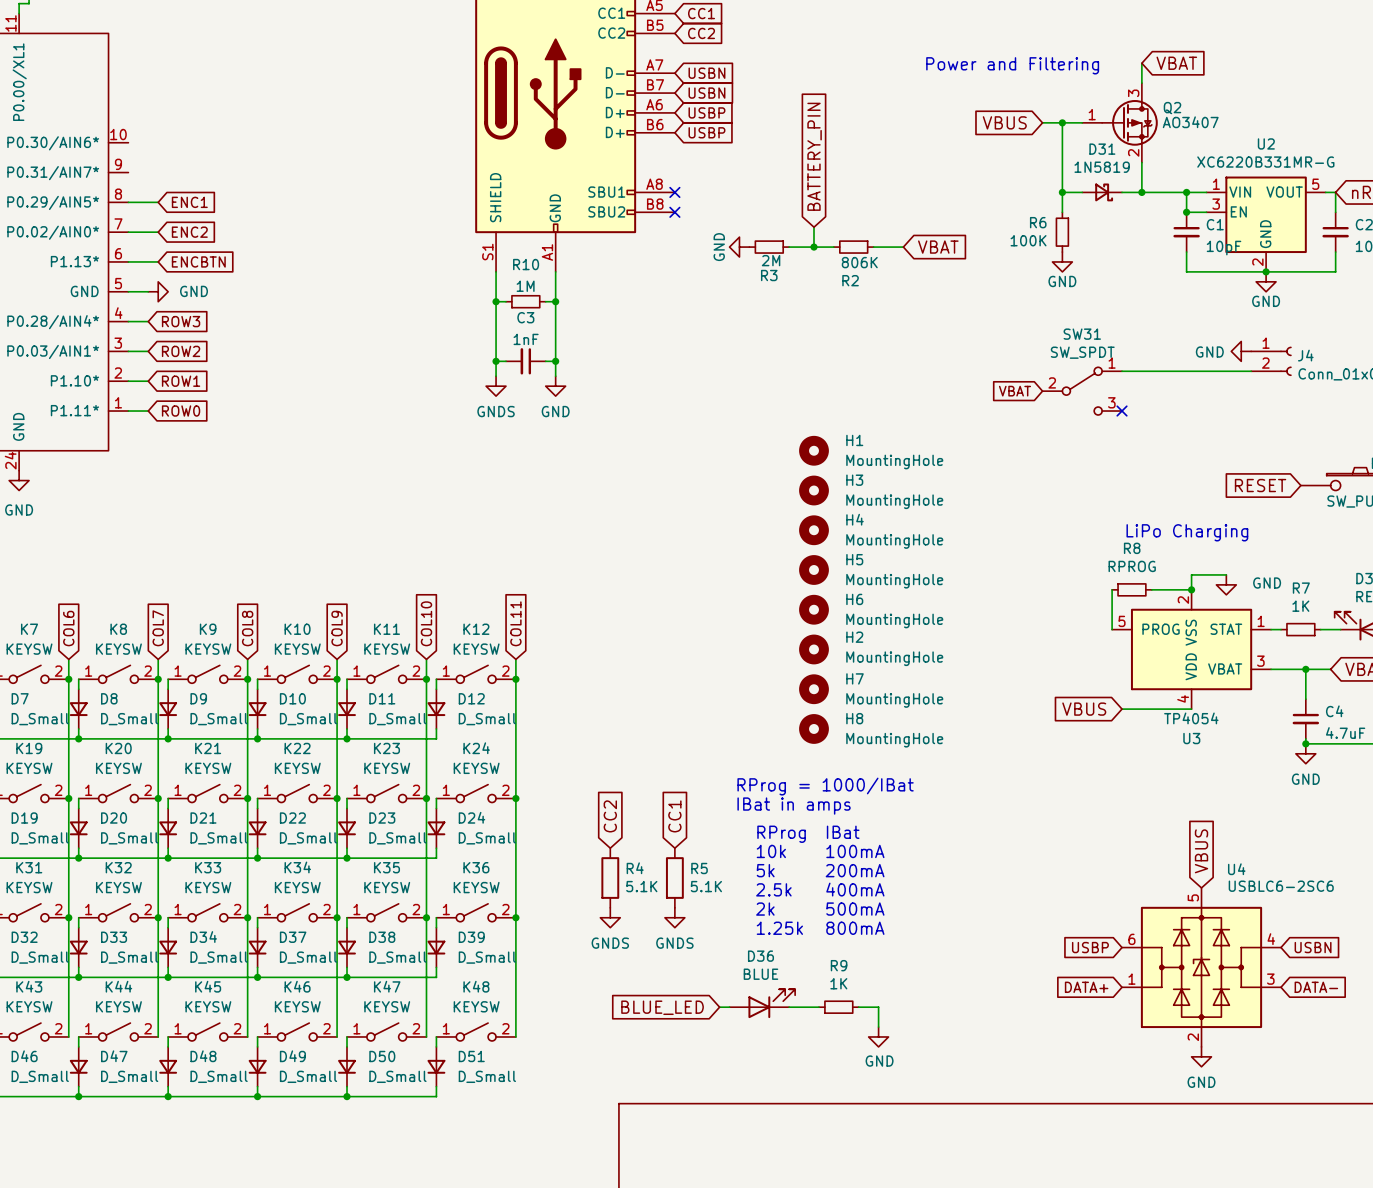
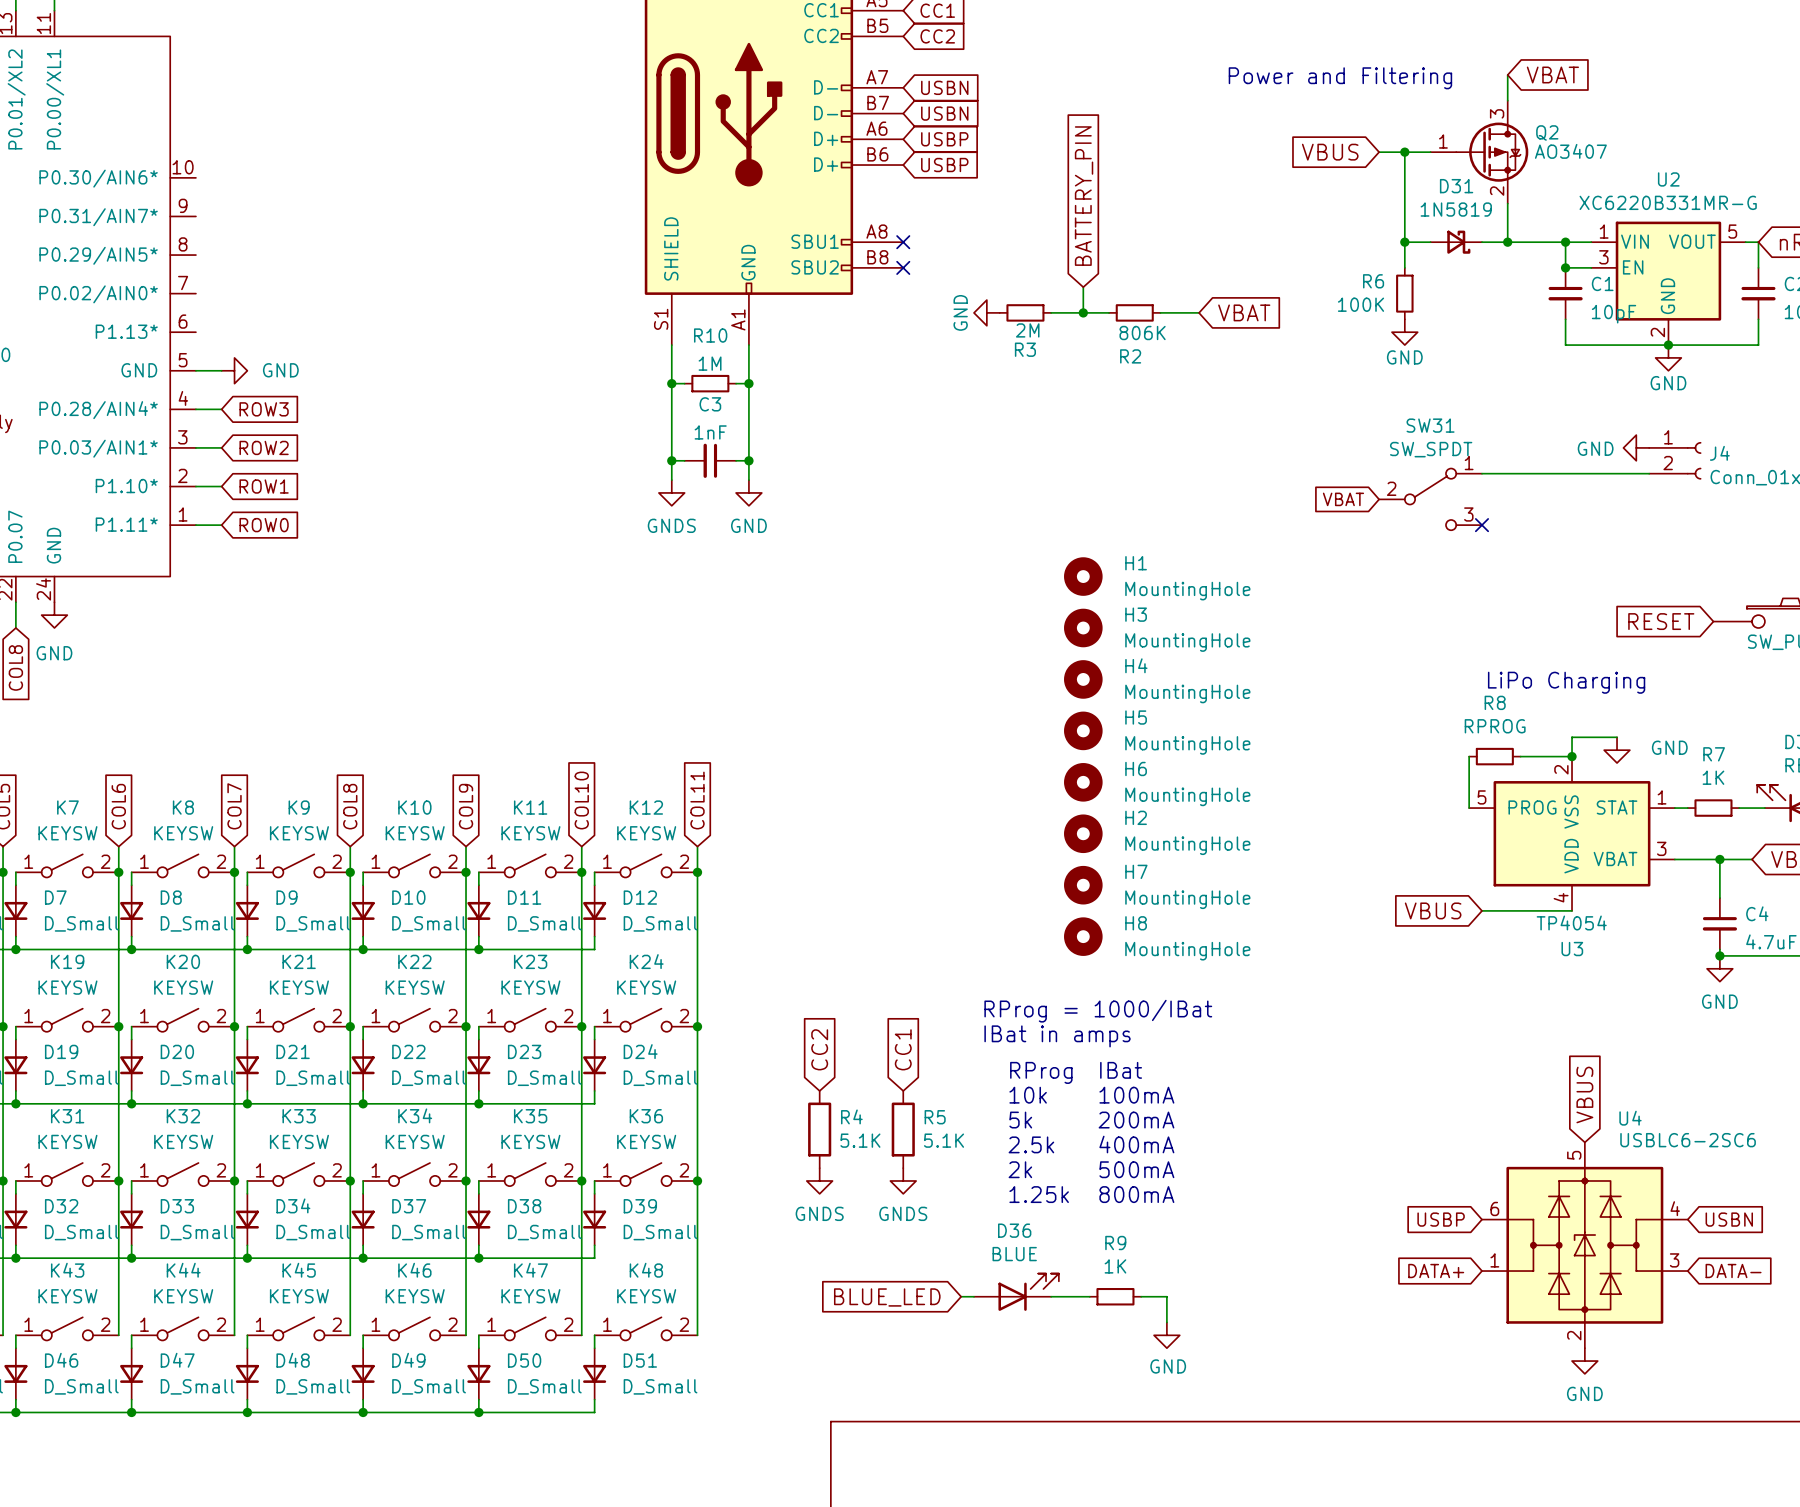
wire: (128, 202) (158, 202) -> none
global label: ENC1 (189, 202) -> none
wire: (128, 232) (158, 232) -> none
global label: ENC2 (189, 232) -> none
wire: (128, 261) (158, 261) -> none
global label: ENCBTN (198, 261) -> none

